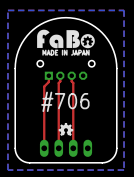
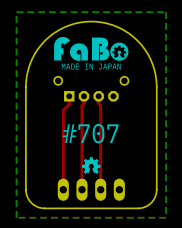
text: #706 (65, 101) -> #707 (90, 133)

